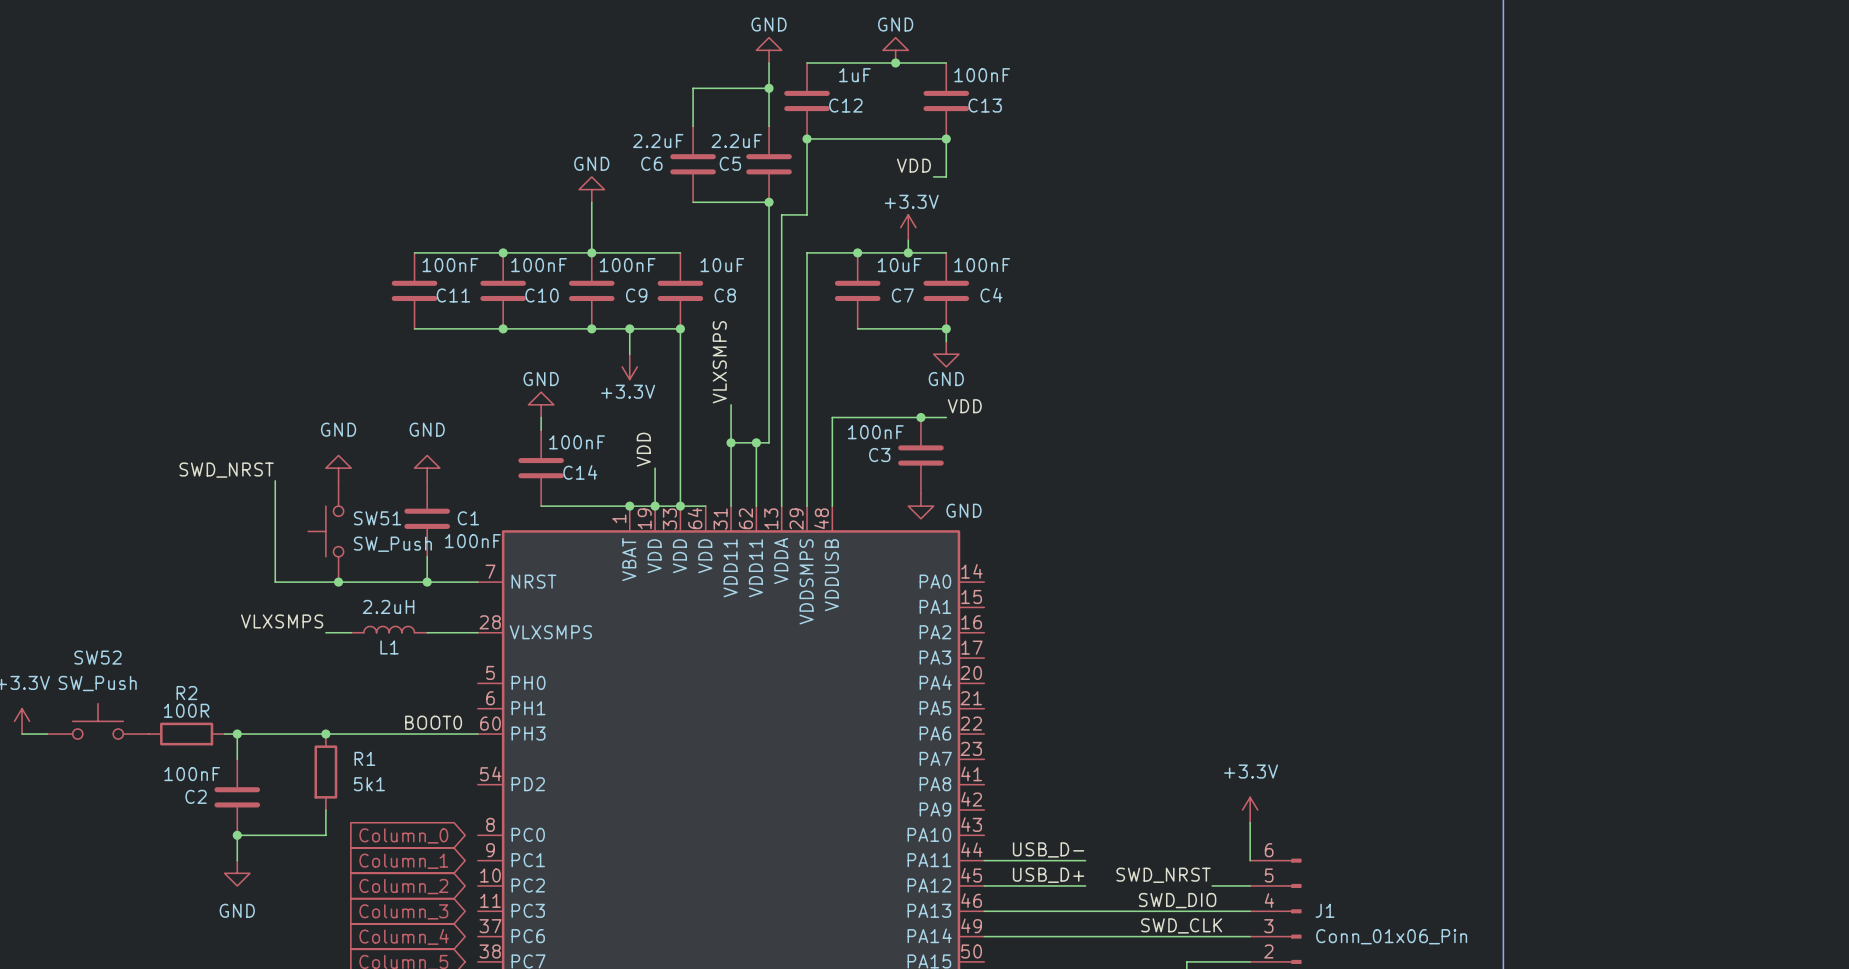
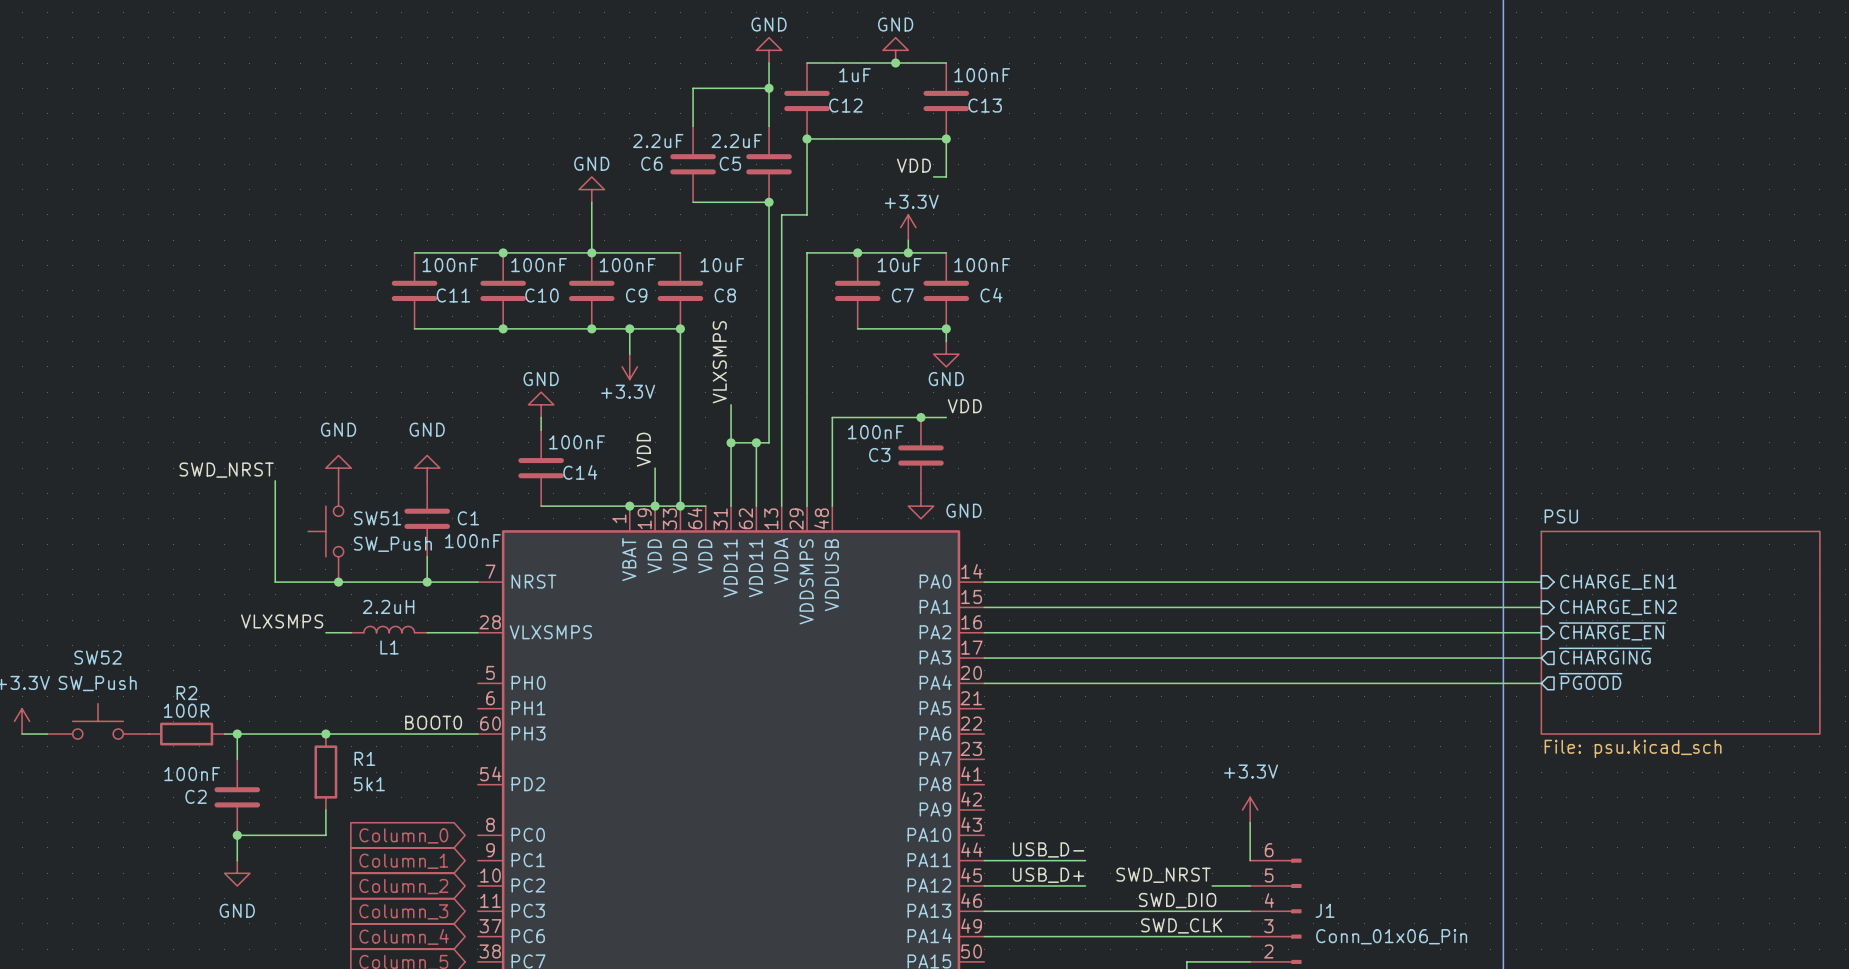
wire: none -> (984, 582) (1541, 582)
sheet pin: none -> CHARGE_EN1 (1618, 582)
wire: none -> (984, 607) (1541, 607)
sheet pin: none -> CHARGE_EN2 (1618, 607)
sheet pin: none -> ~{CHARGE_EN} (1612, 631)
wire: none -> (984, 632) (1541, 632)
sheet PSU: none -> File: psu.kicad_sch (1680, 632)
sheet pin: none -> ~{CHARGING} (1605, 656)
wire: none -> (984, 658) (1541, 658)
sheet pin: none -> ~{PGOOD} (1590, 681)
wire: none -> (984, 683) (1541, 683)

